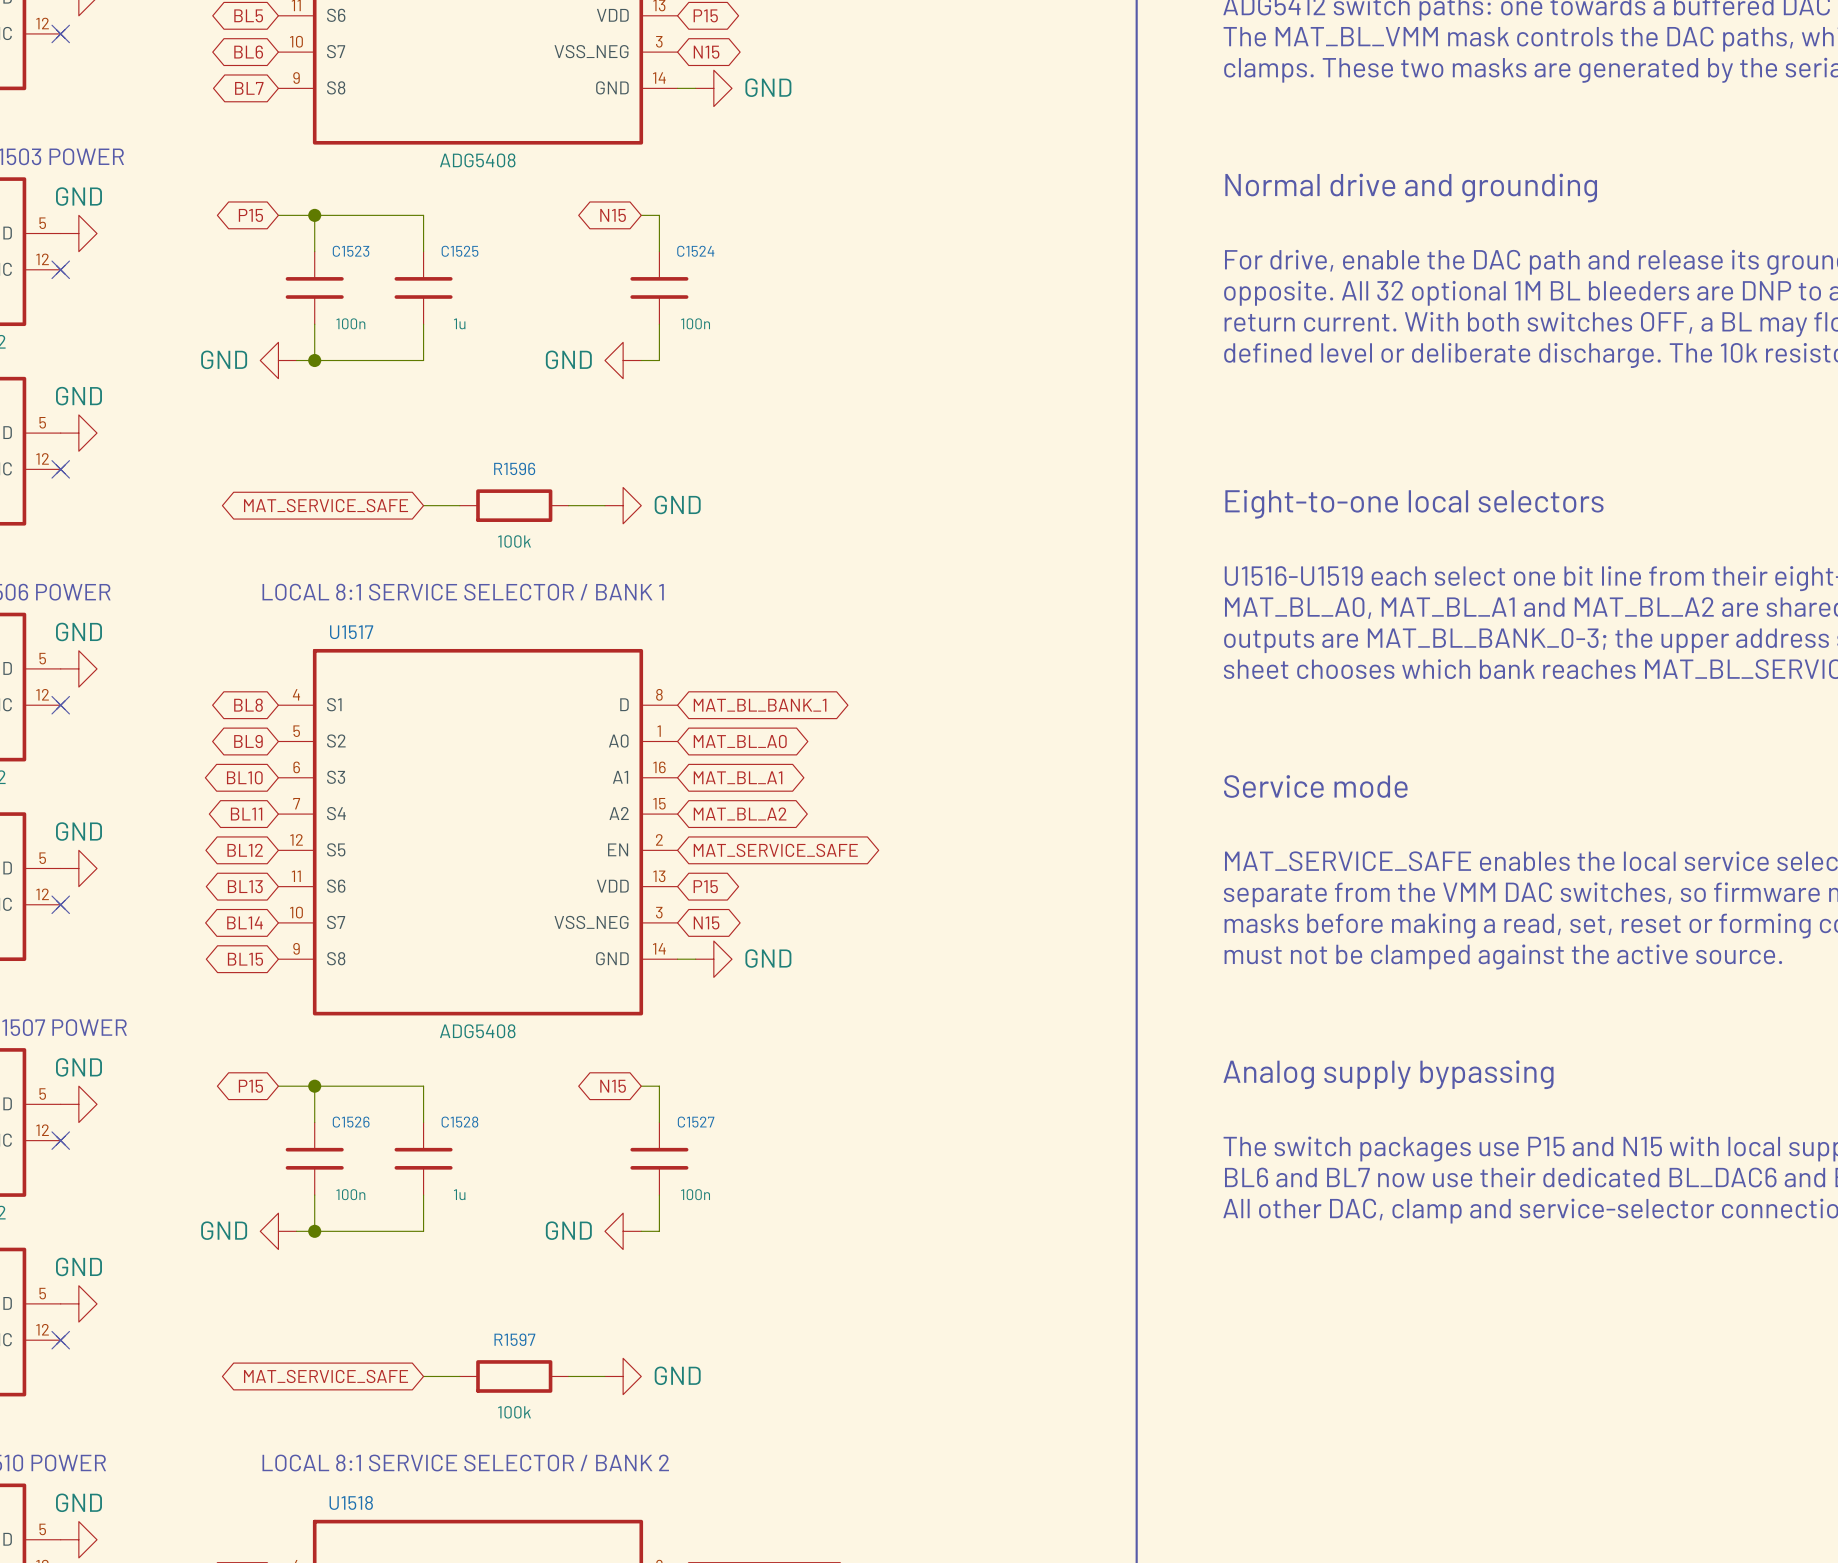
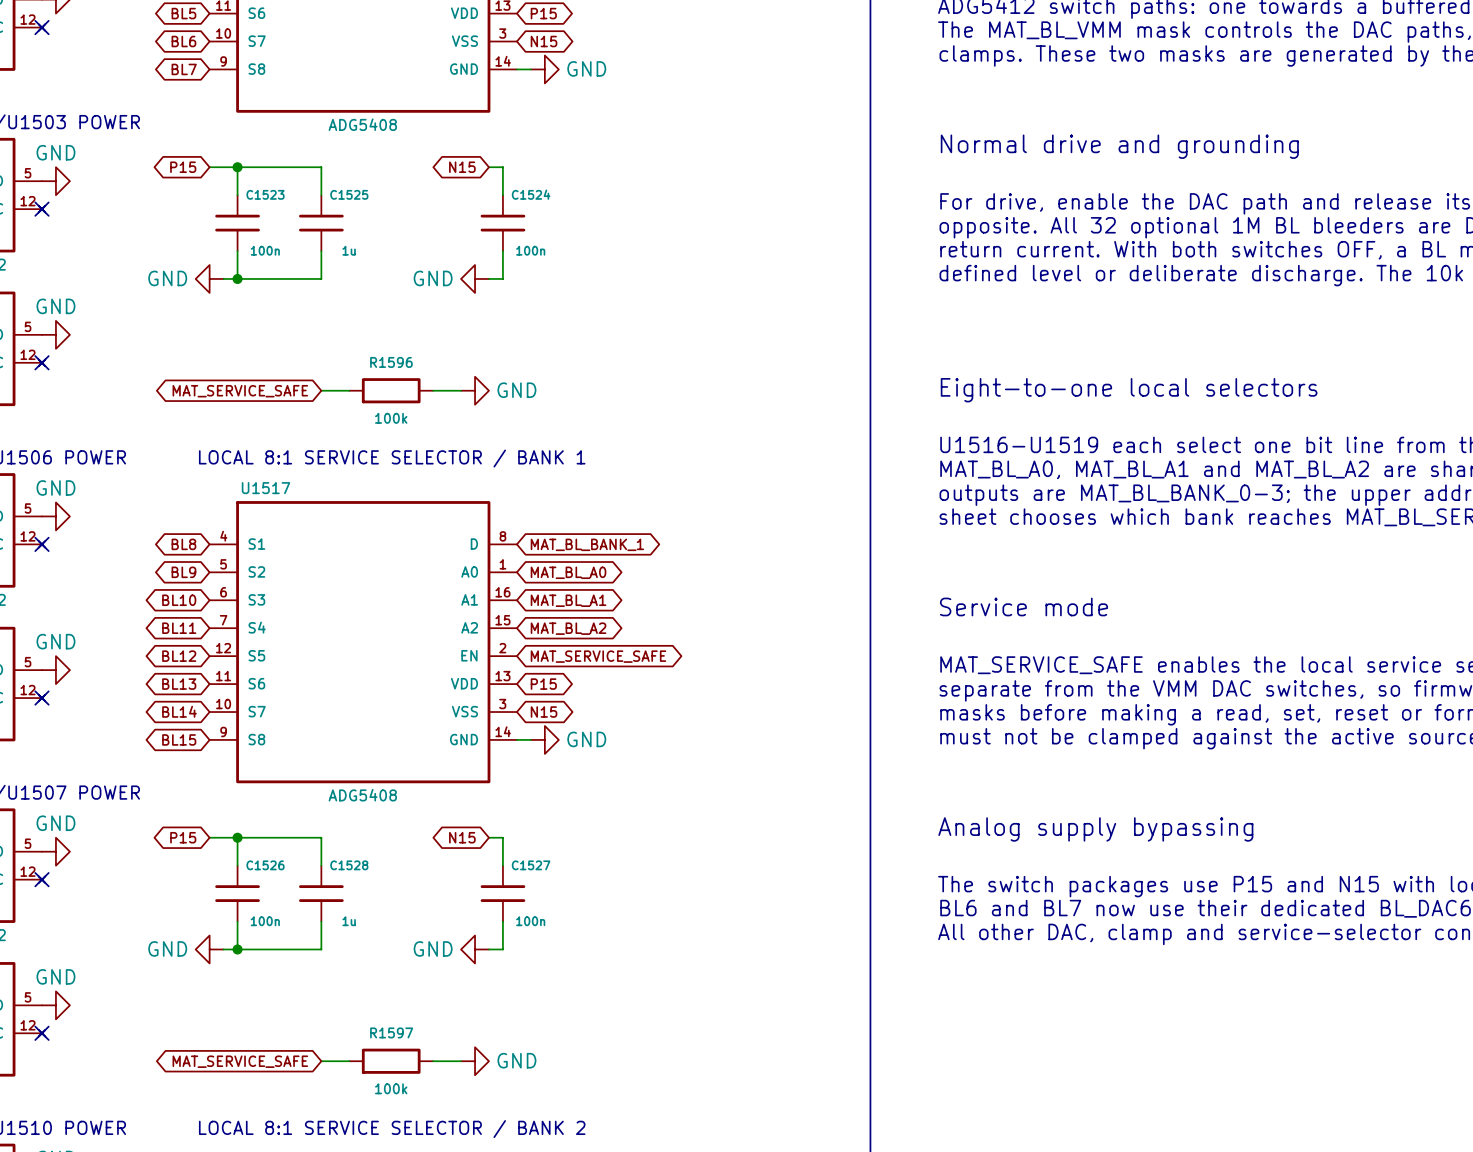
part pin name: VSS_NEG (591, 51) -> VSS (464, 41)
U1517 pin name: VSS_NEG (591, 922) -> VSS (464, 711)

